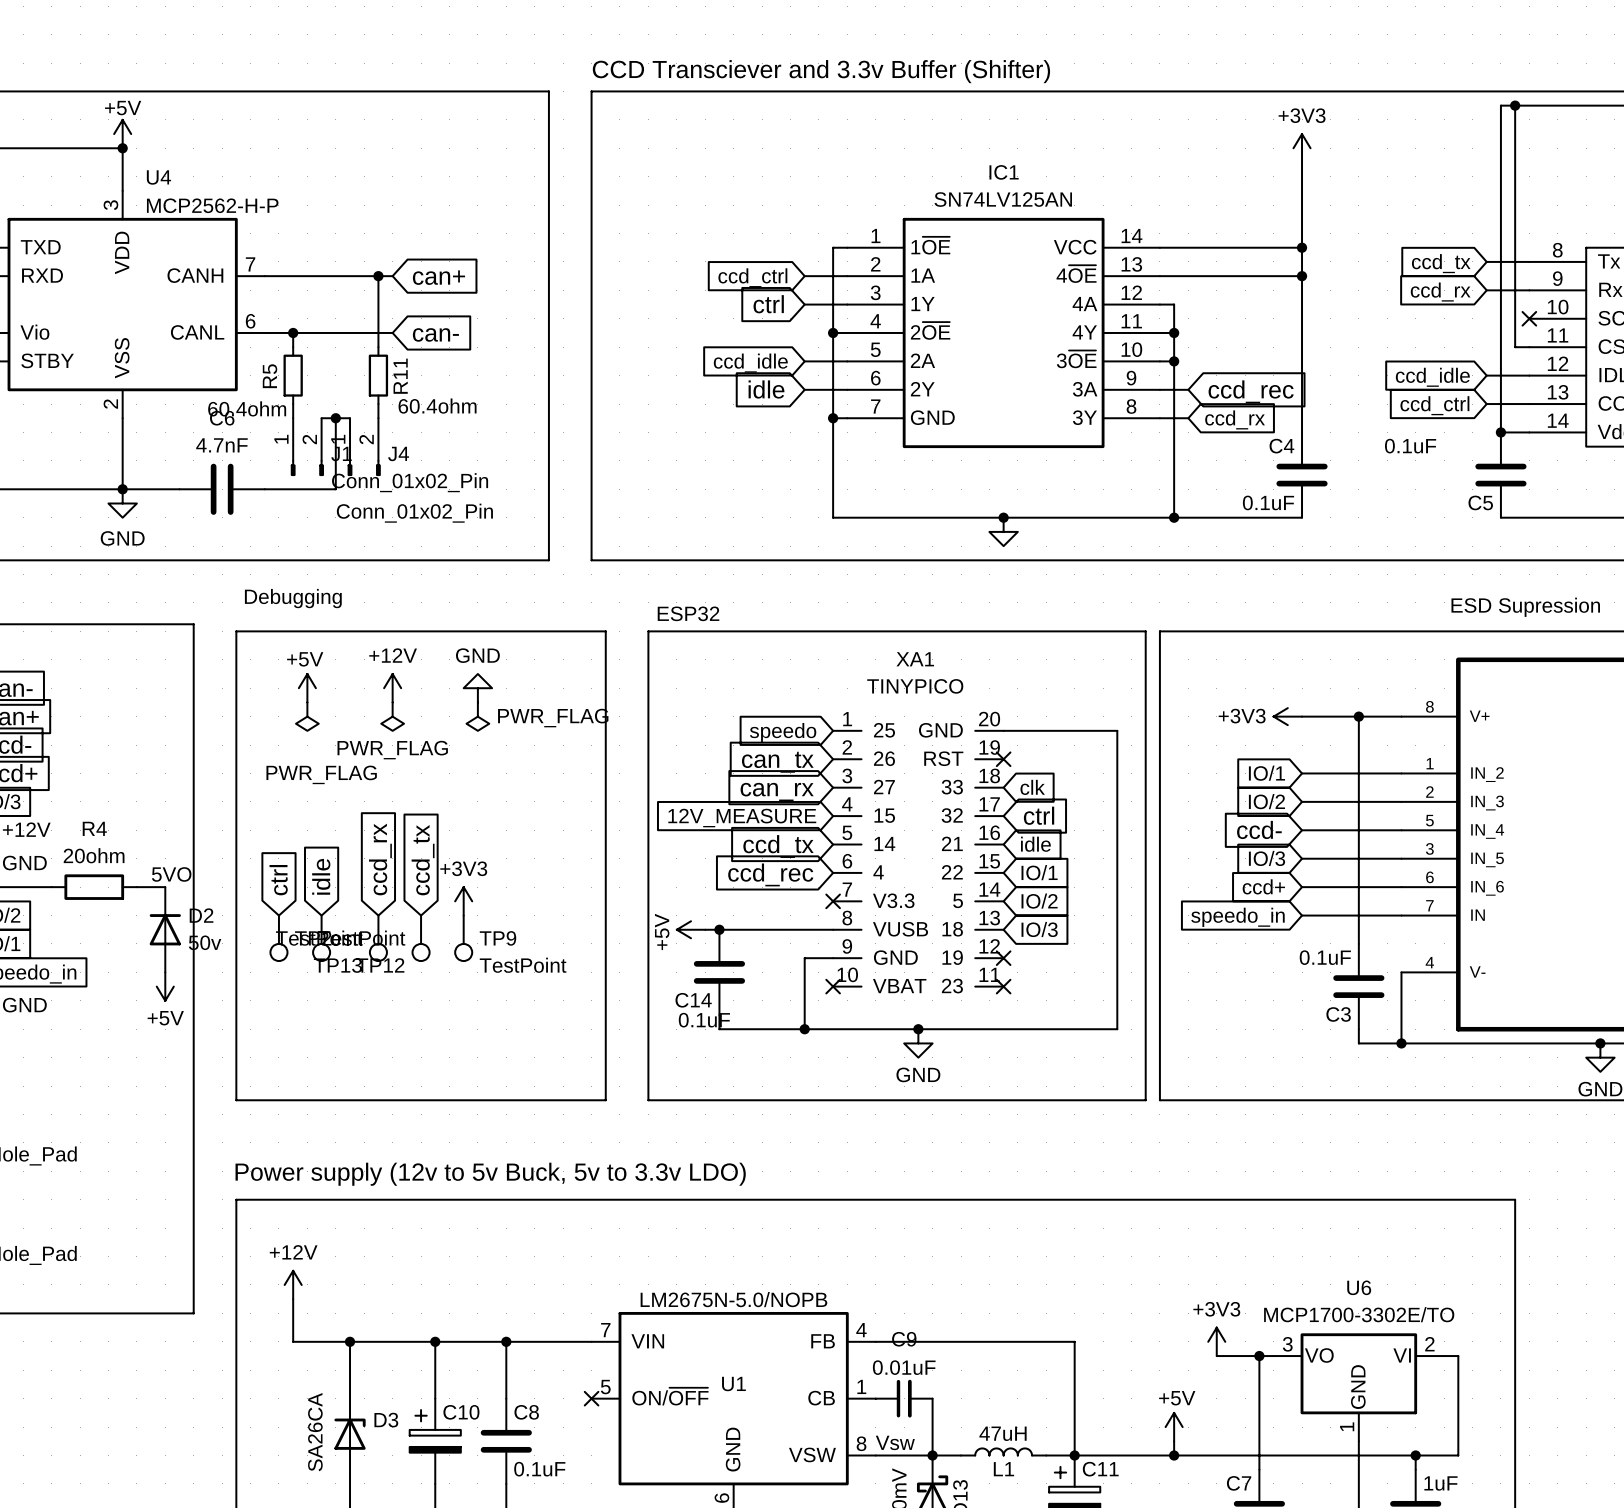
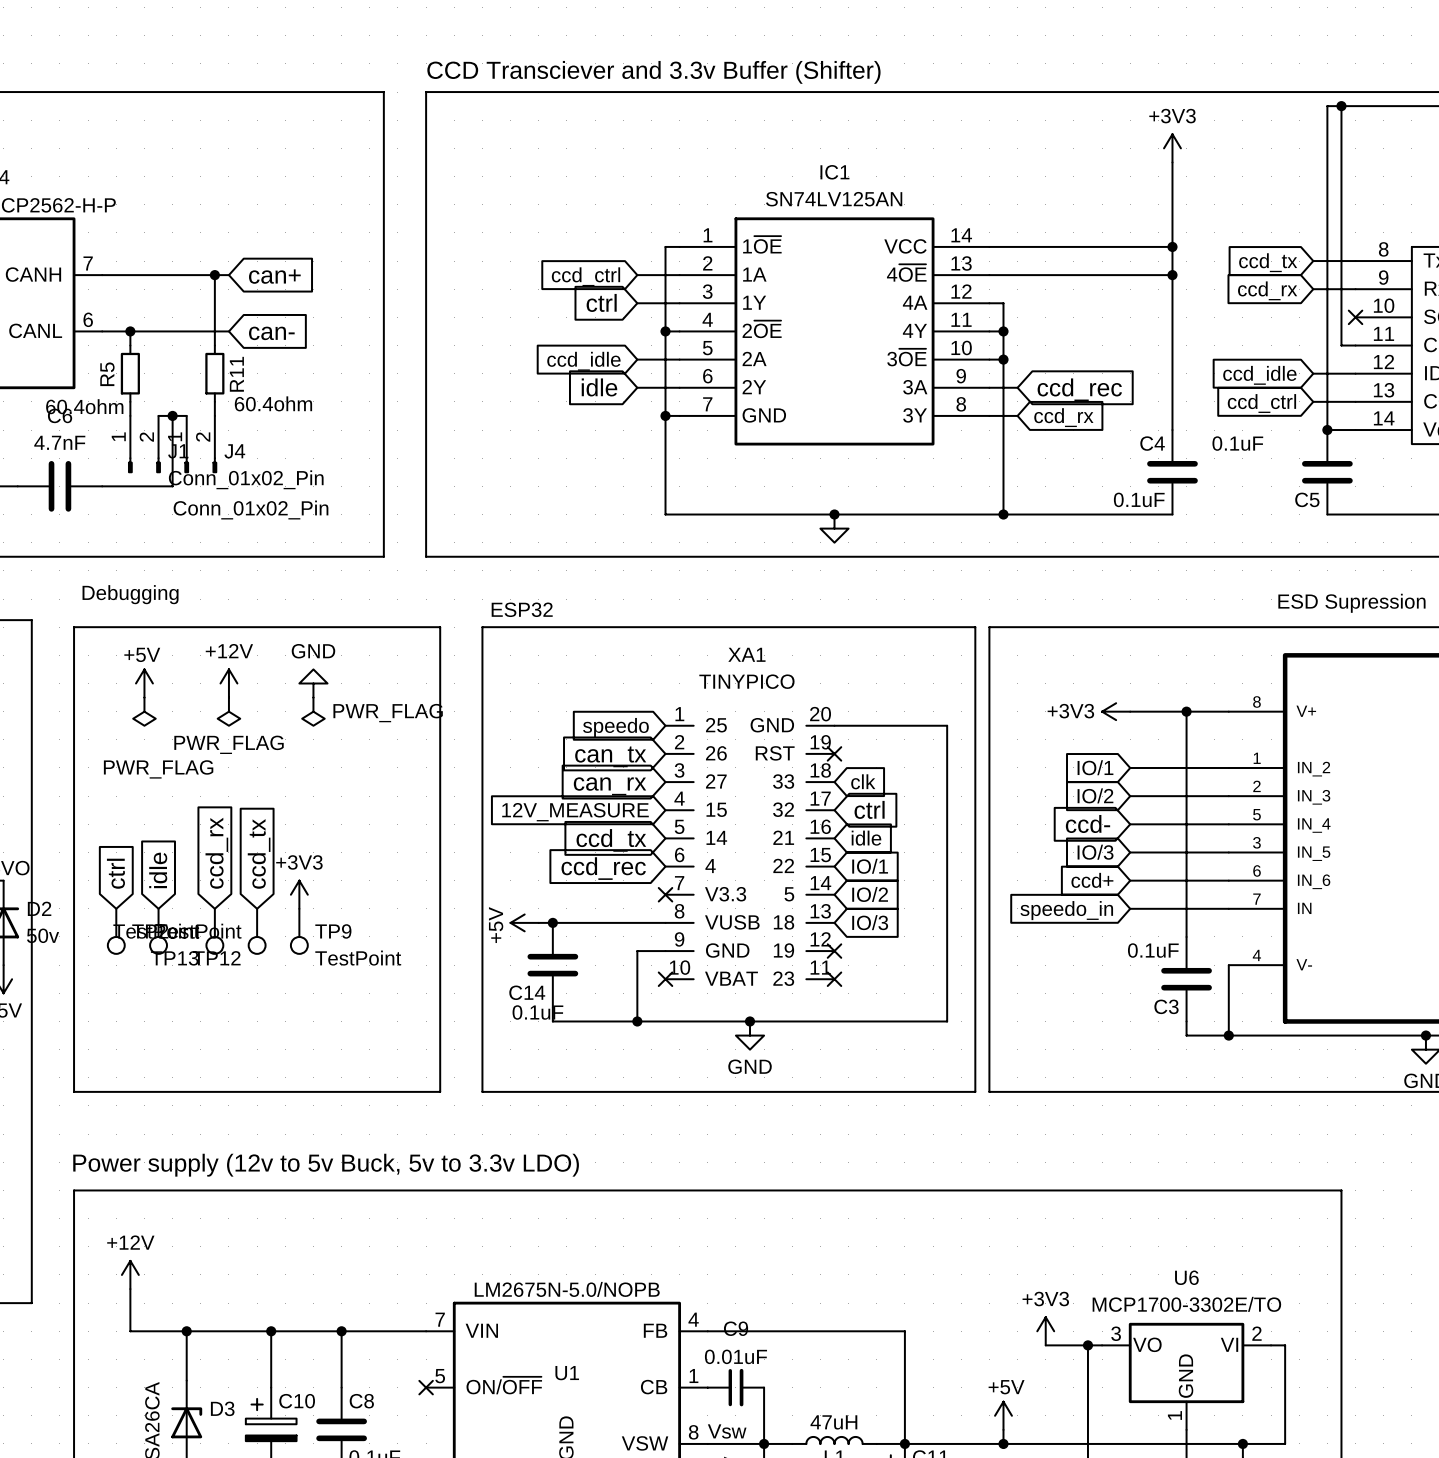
power symbol position: +3V3 (1302, 148) -> +3V3 (1172, 148)
wire: (1302, 162) (1302, 432) -> (1172, 162) (1172, 430)
wire: none -> (1130, 246) (1172, 246)
junction: (1302, 247) -> none
junction: none -> (1172, 246)
wire: none -> (1130, 275) (1172, 275)
junction: (1302, 276) -> none
junction: none -> (1172, 275)
C4 position: (1302, 475) -> (1172, 472)
wire: none -> (1130, 514) (1172, 514)

